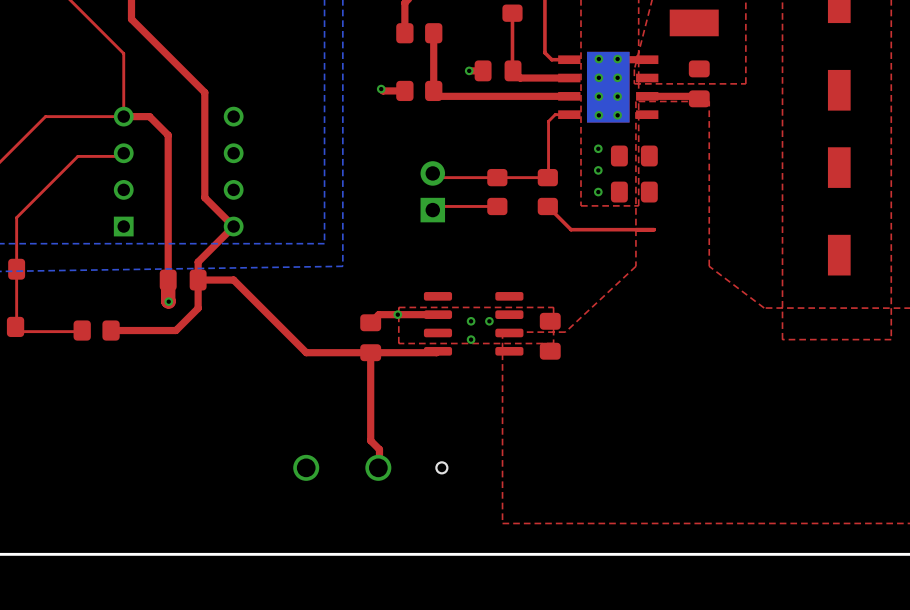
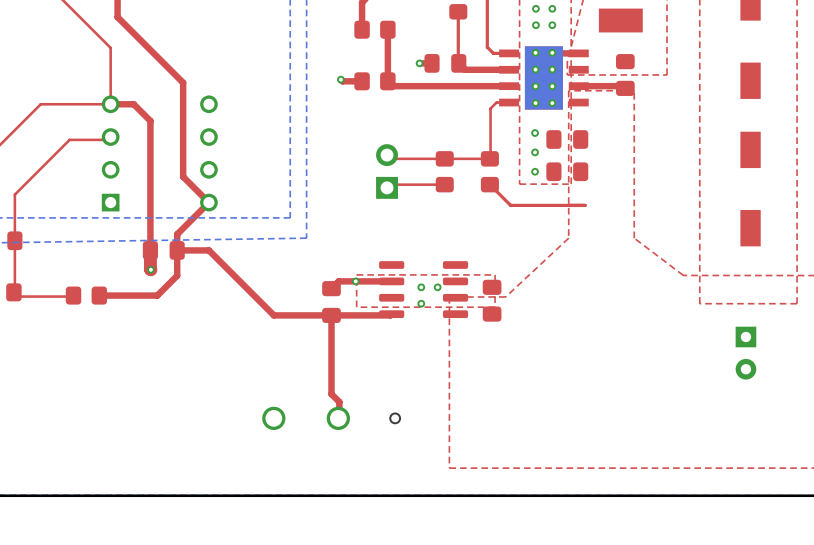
via: none -> (535, 8)
via: none -> (552, 8)
via: none -> (535, 25)
via: none -> (552, 25)
part: none -> (745, 353)

